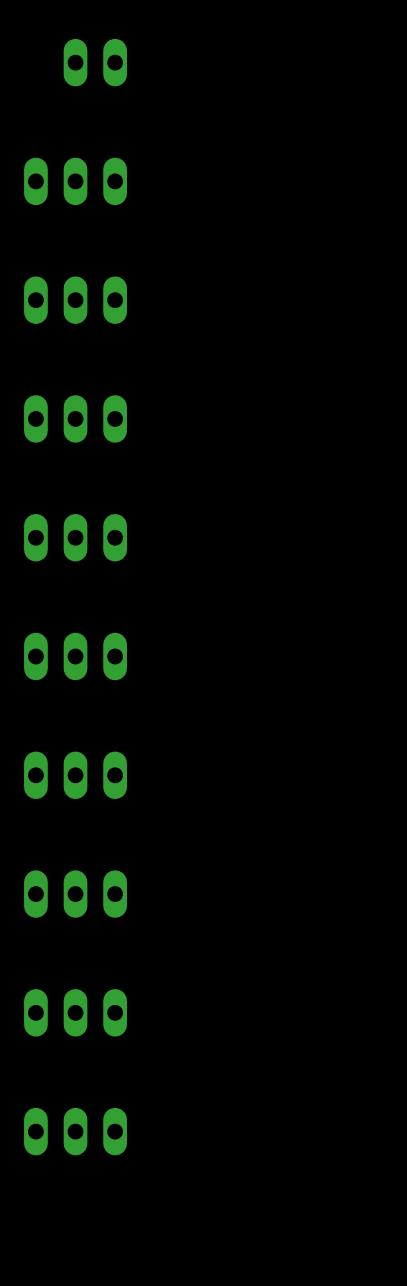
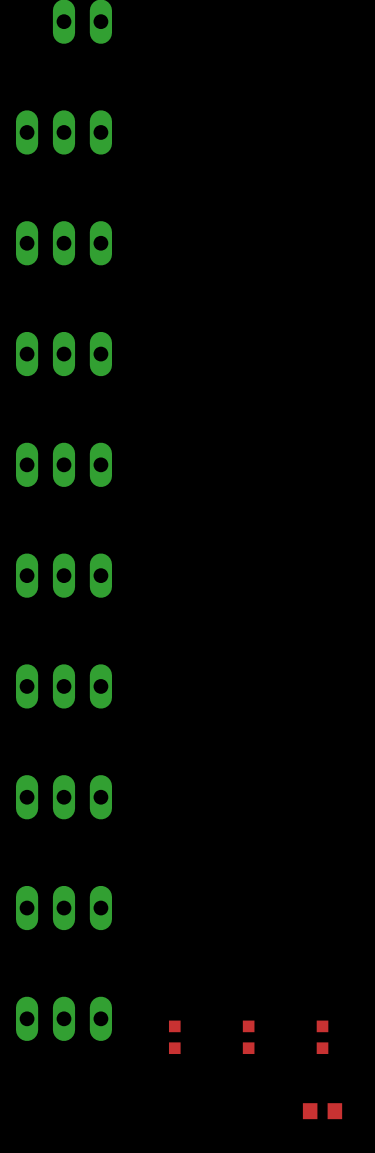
part: none -> (174, 1037)
part: none -> (248, 1037)
part: none -> (322, 1037)
part: none -> (322, 1111)

